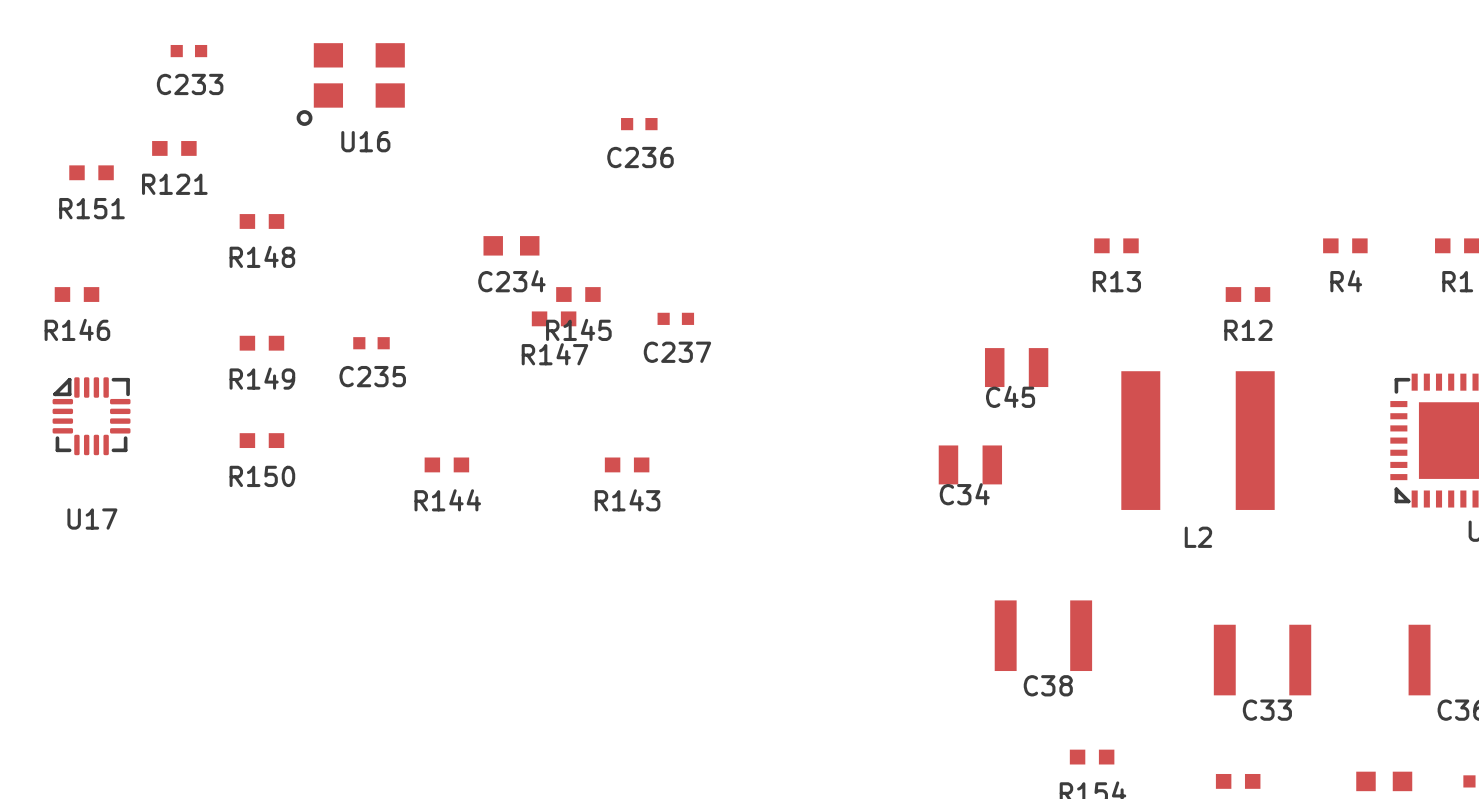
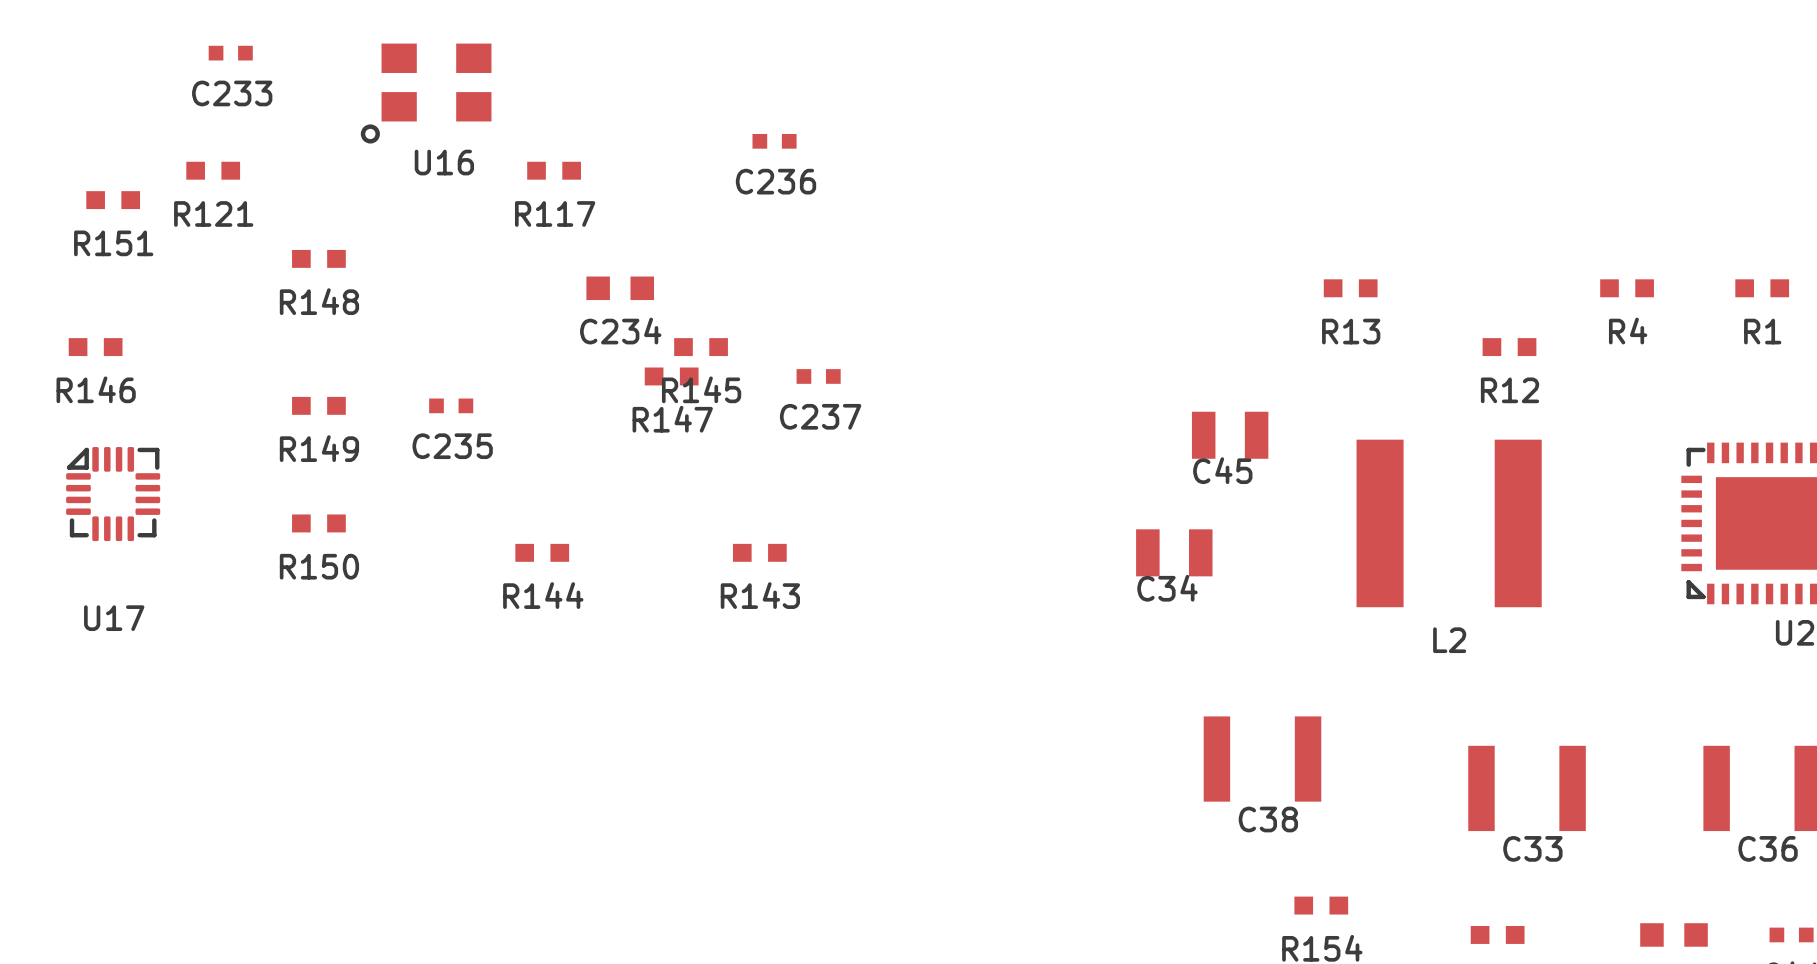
R117: none -> (554, 170)

